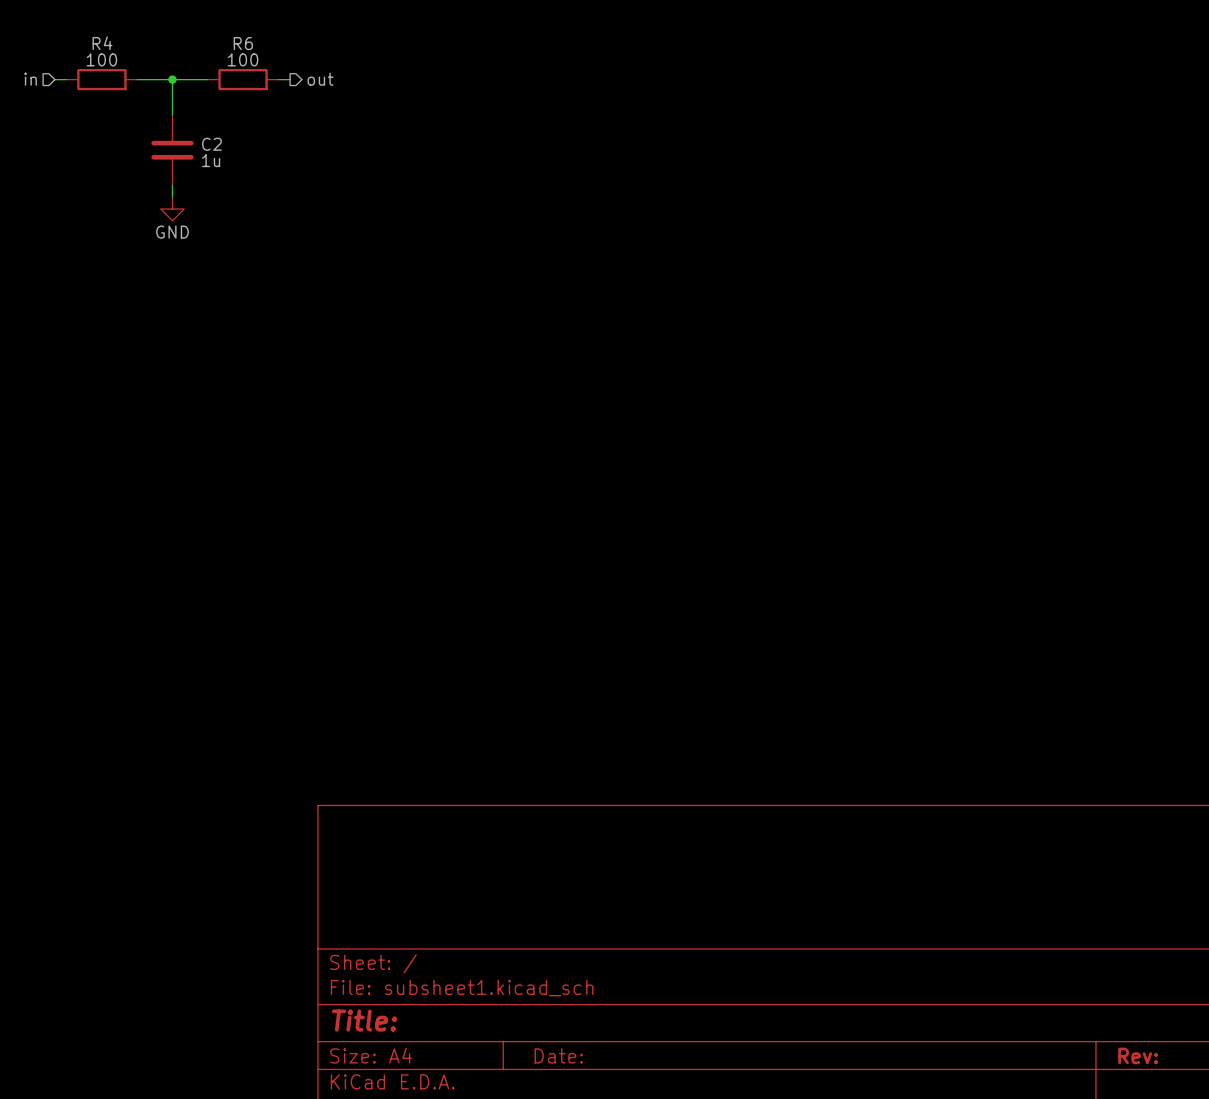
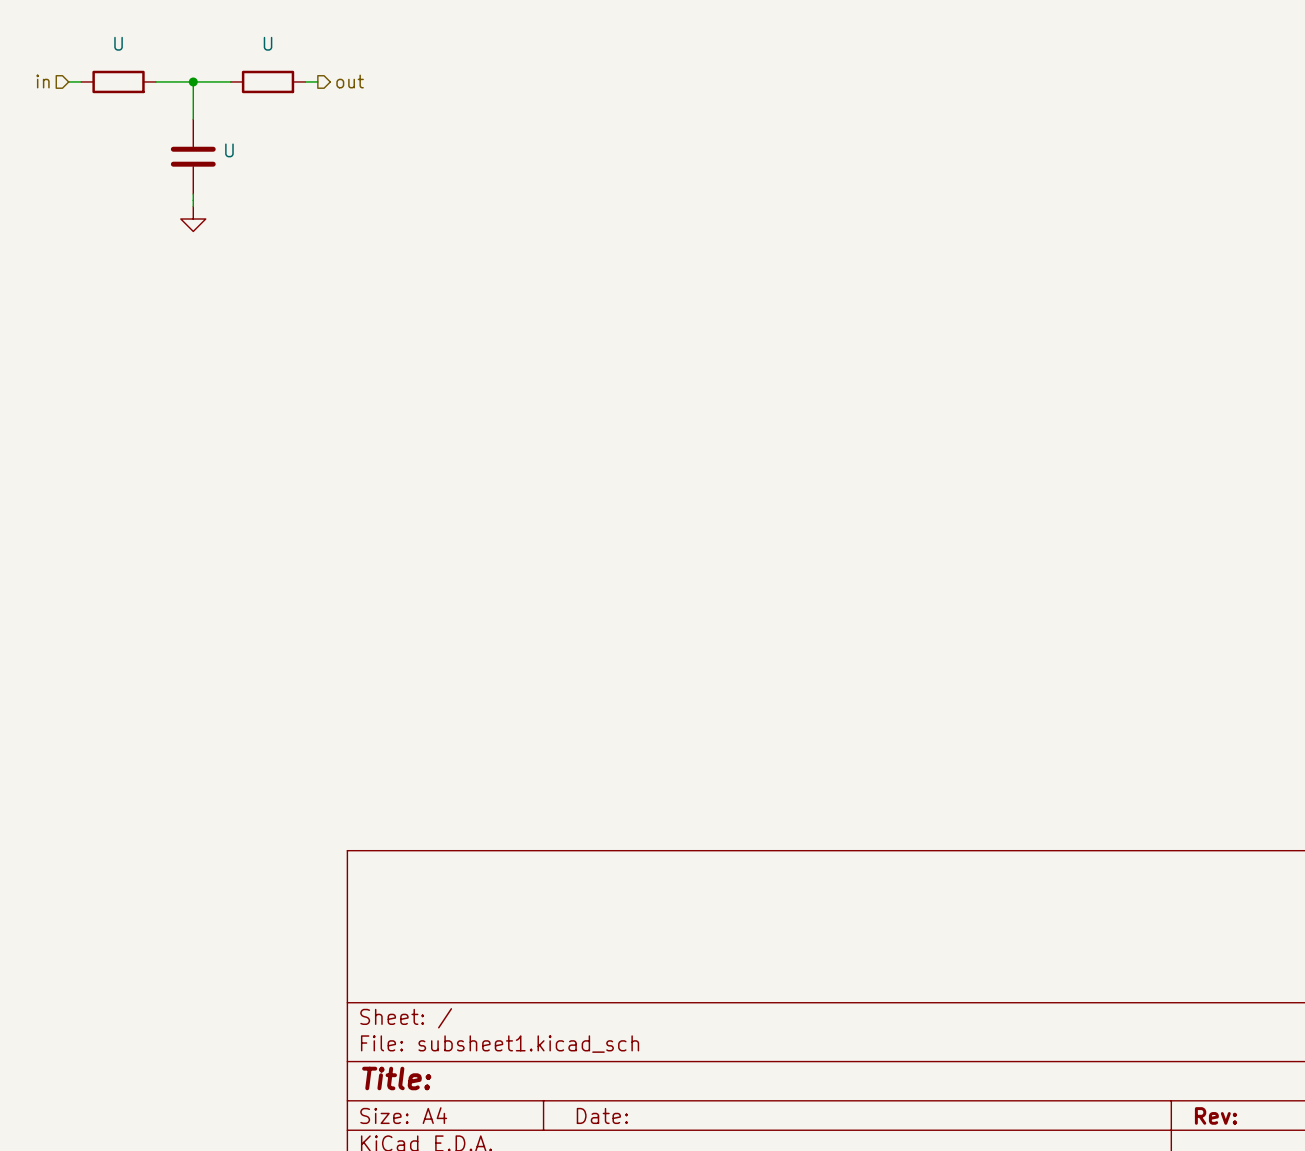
R4 name: R4 (102, 43) -> U (118, 43)
R6 name: R6 (243, 43) -> U (268, 43)
R4 value: 100 (101, 59) -> none
R6 value: 100 (243, 59) -> none
C2 name: C2 (211, 144) -> U (229, 150)
C2 value: 1u (211, 160) -> none
power symbol text: GND (172, 232) -> none

